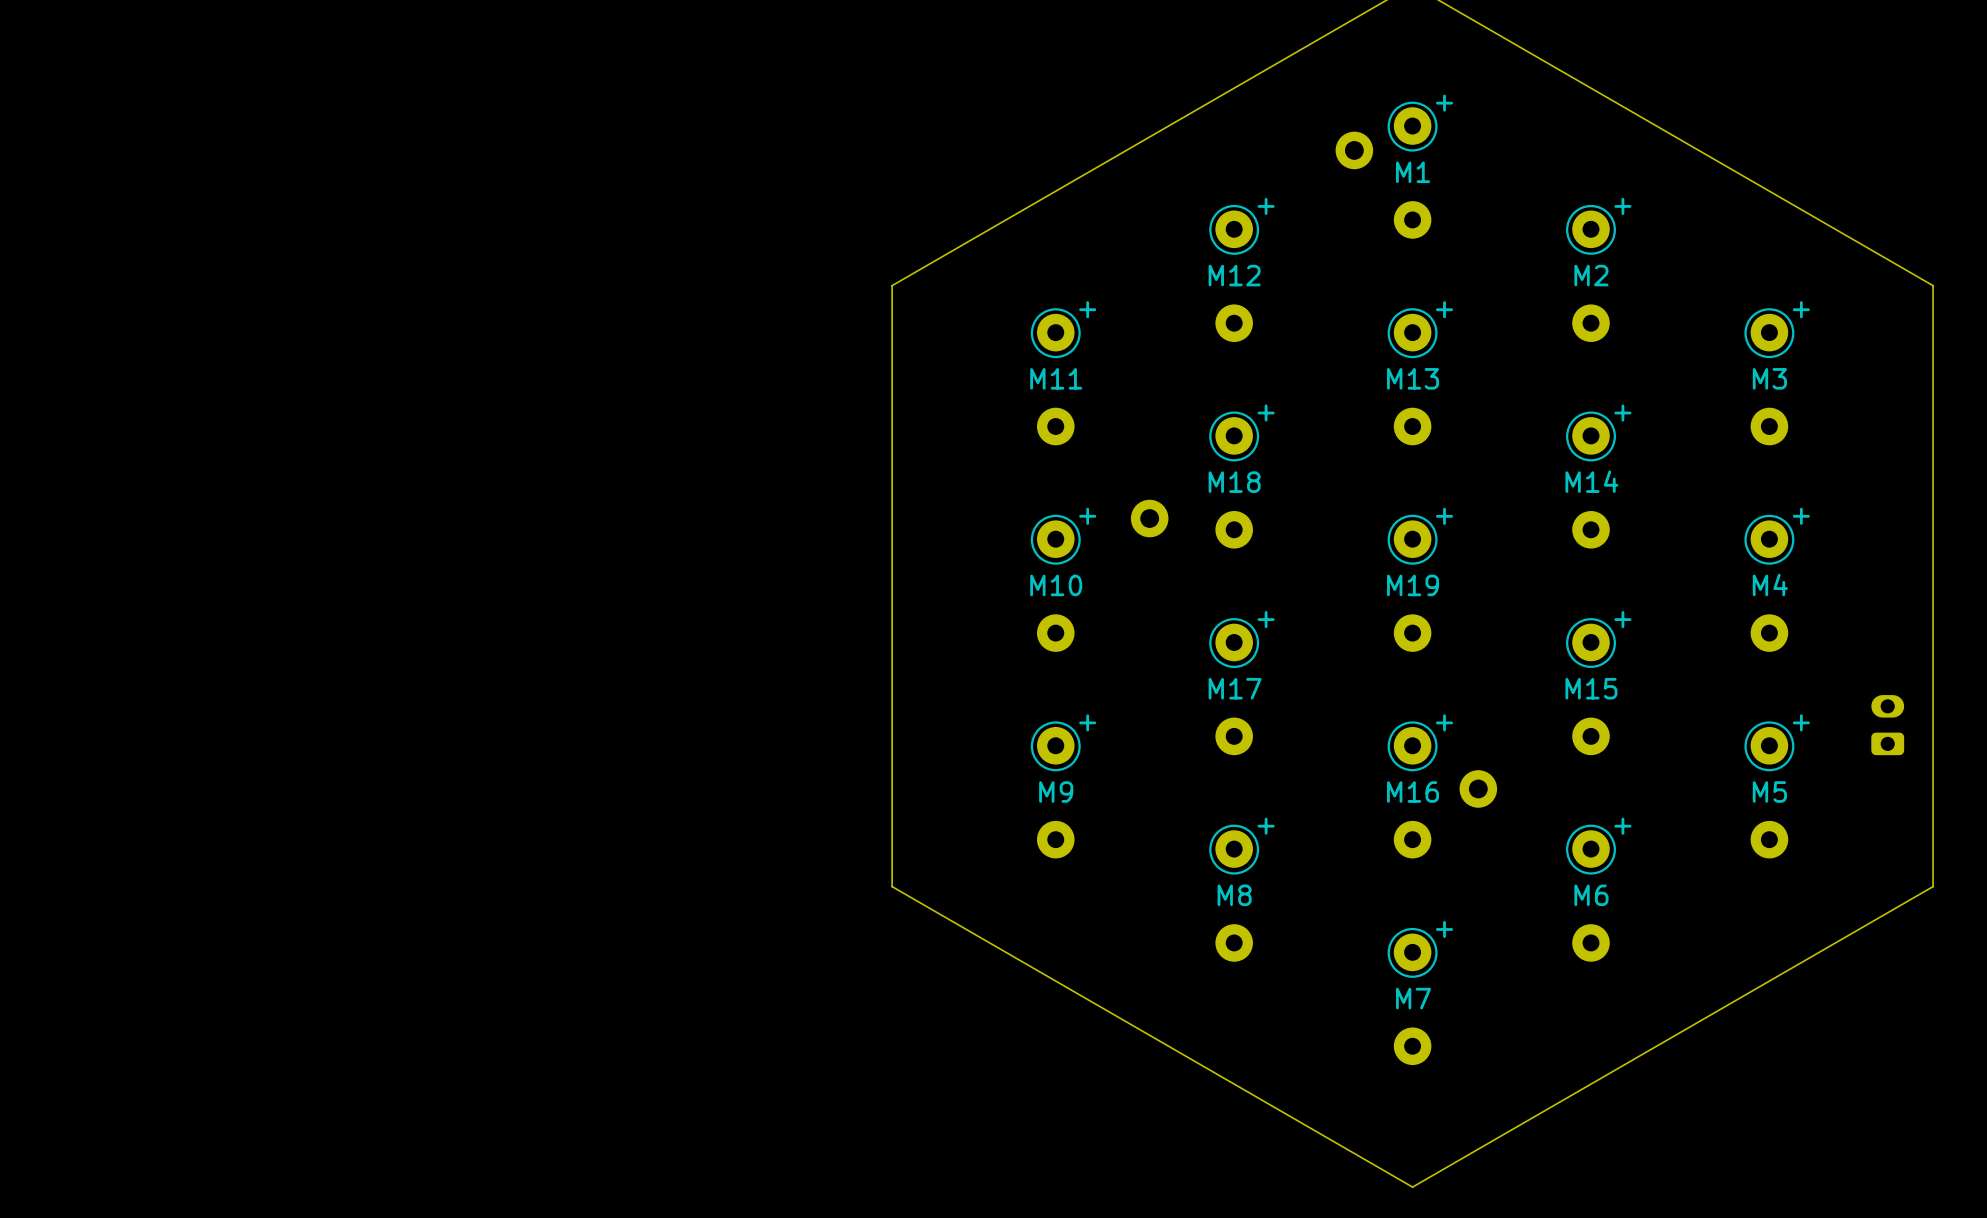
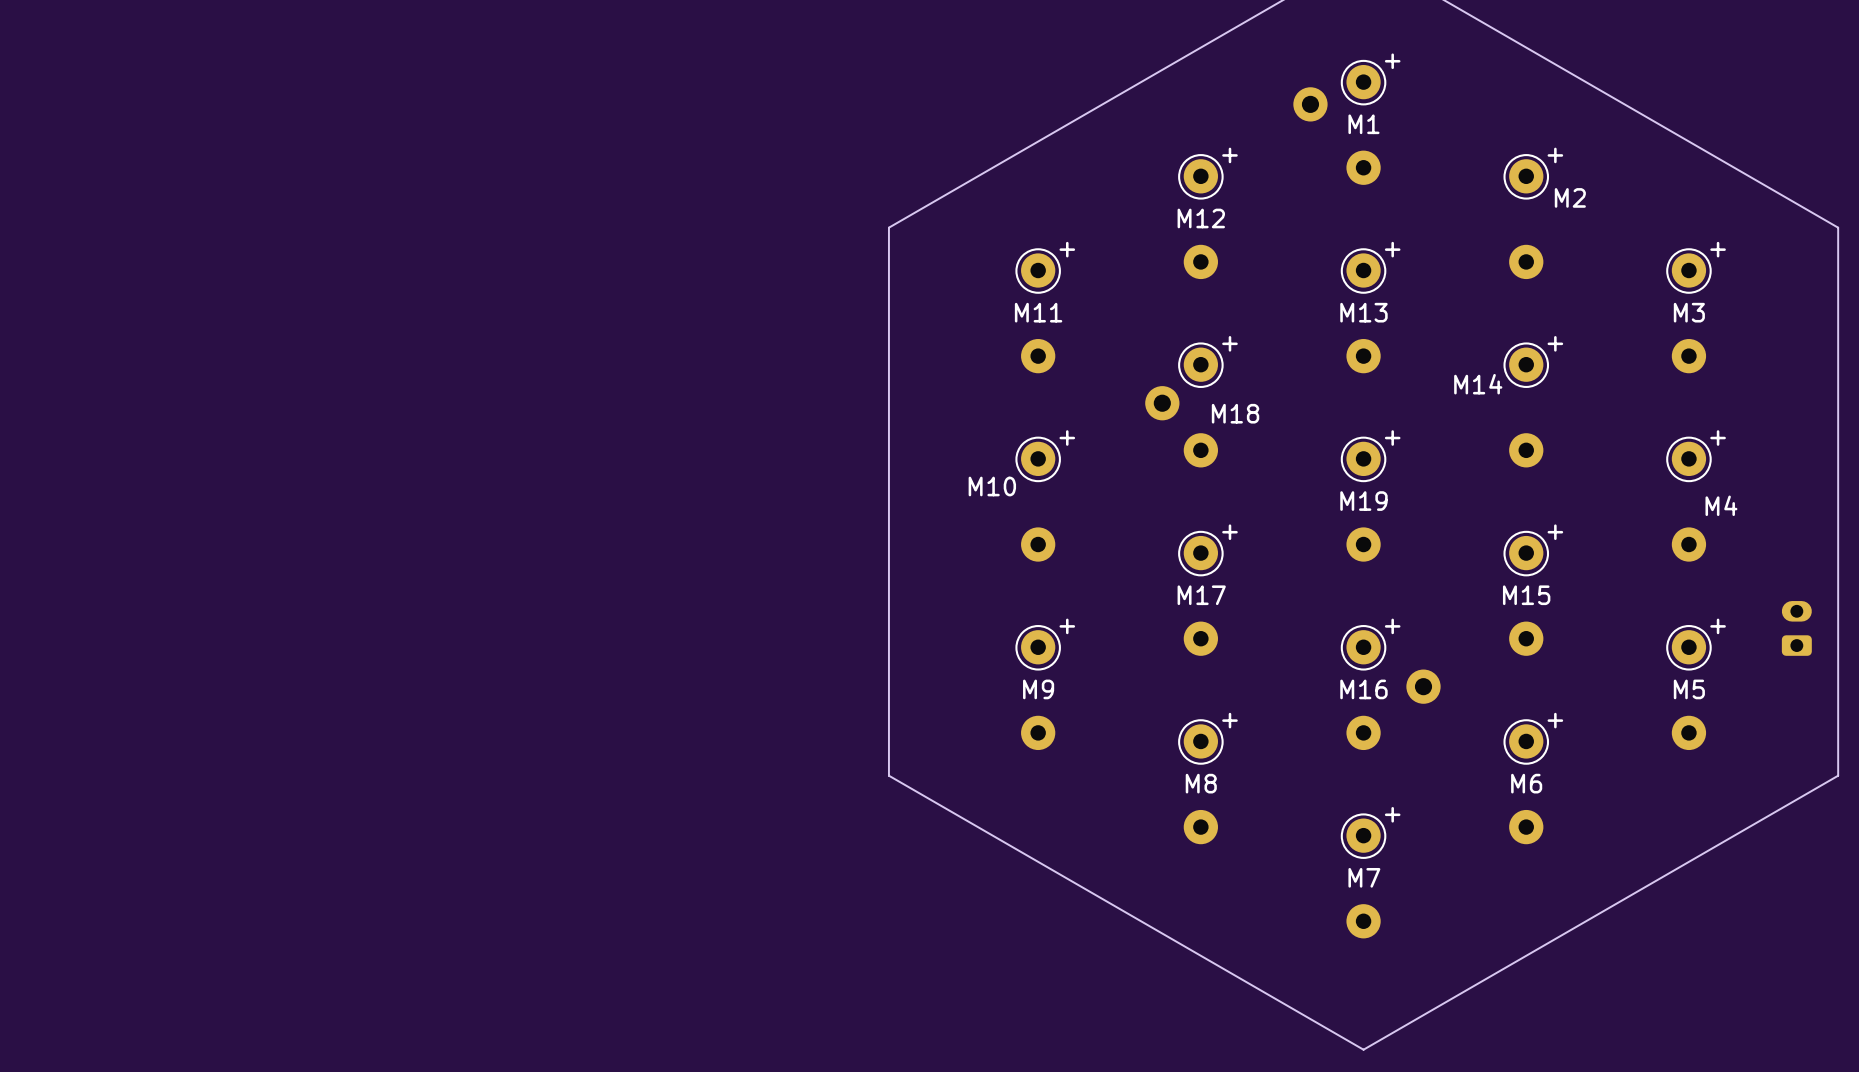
M2 name position: M2 (1591, 275) -> M2 (1570, 197)
M14 name position: M14 (1591, 481) -> M14 (1478, 384)
M18 name position: M18 (1234, 482) -> M18 (1235, 413)
part position: (1149, 518) -> (1162, 403)
M4 name position: M4 (1770, 584) -> M4 (1721, 505)
M10 name position: M10 (1056, 585) -> M10 (992, 486)

